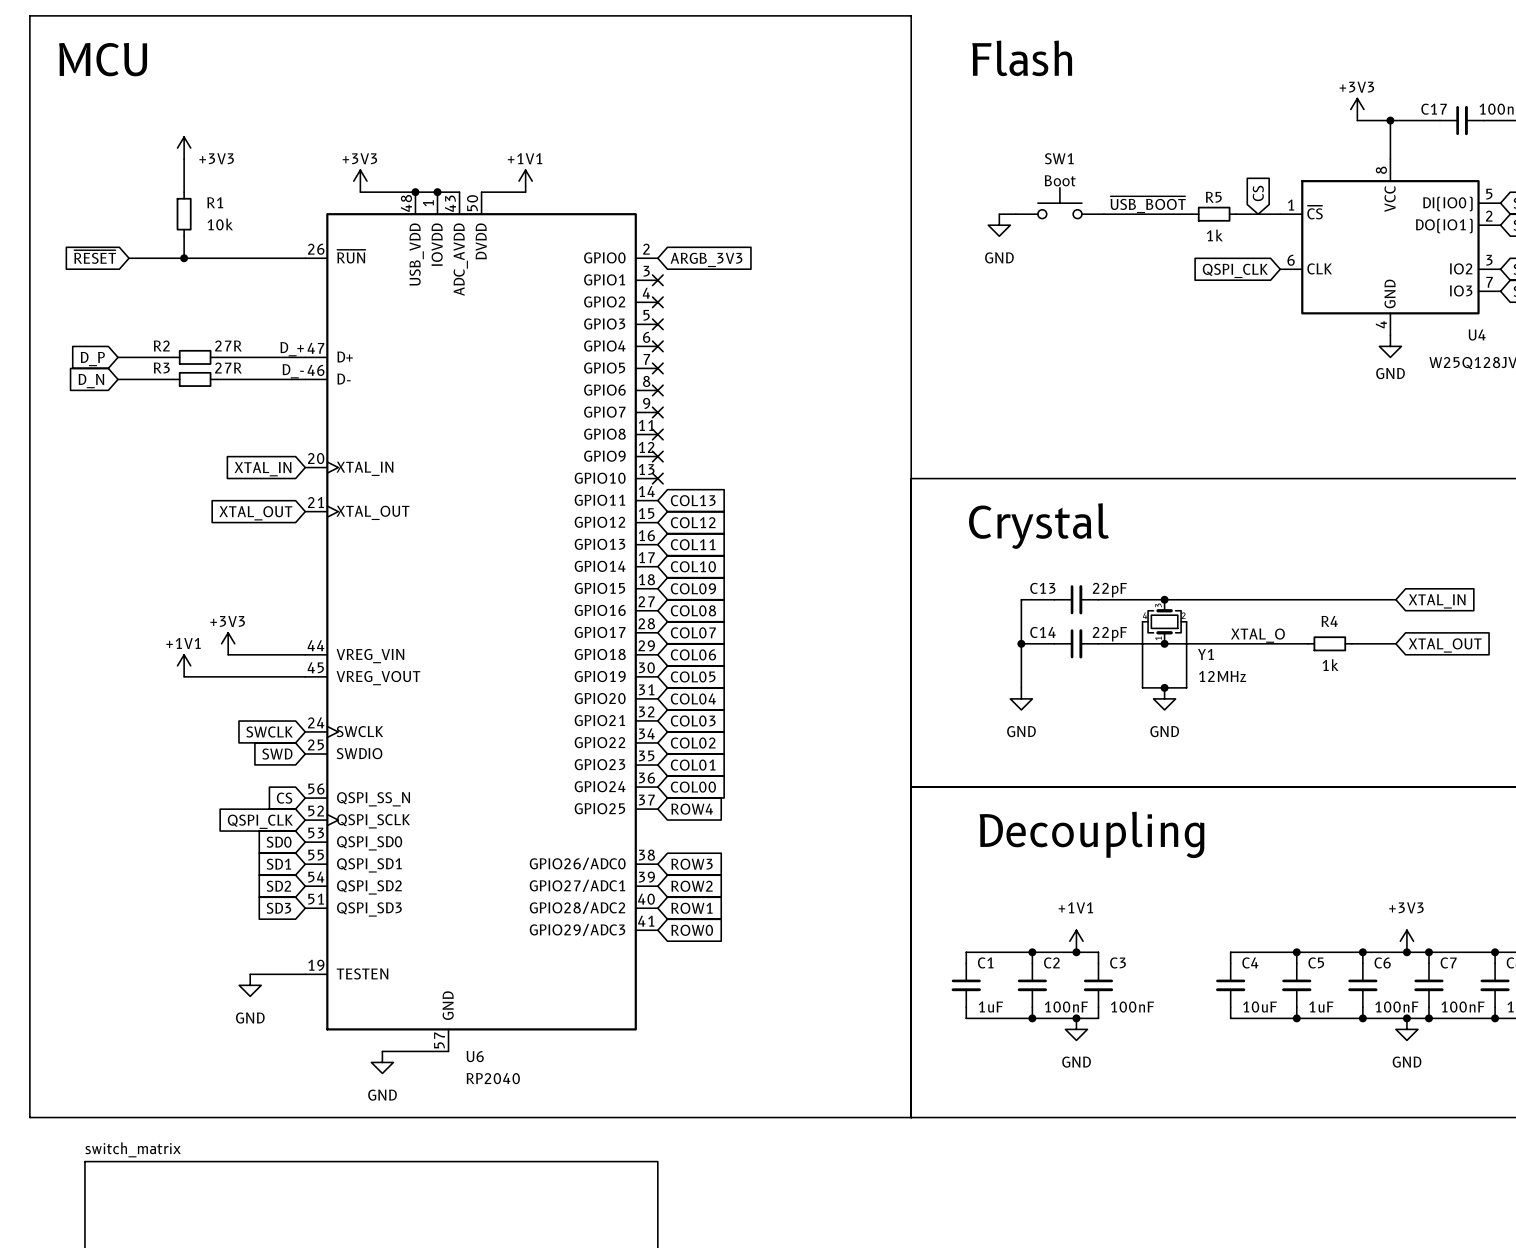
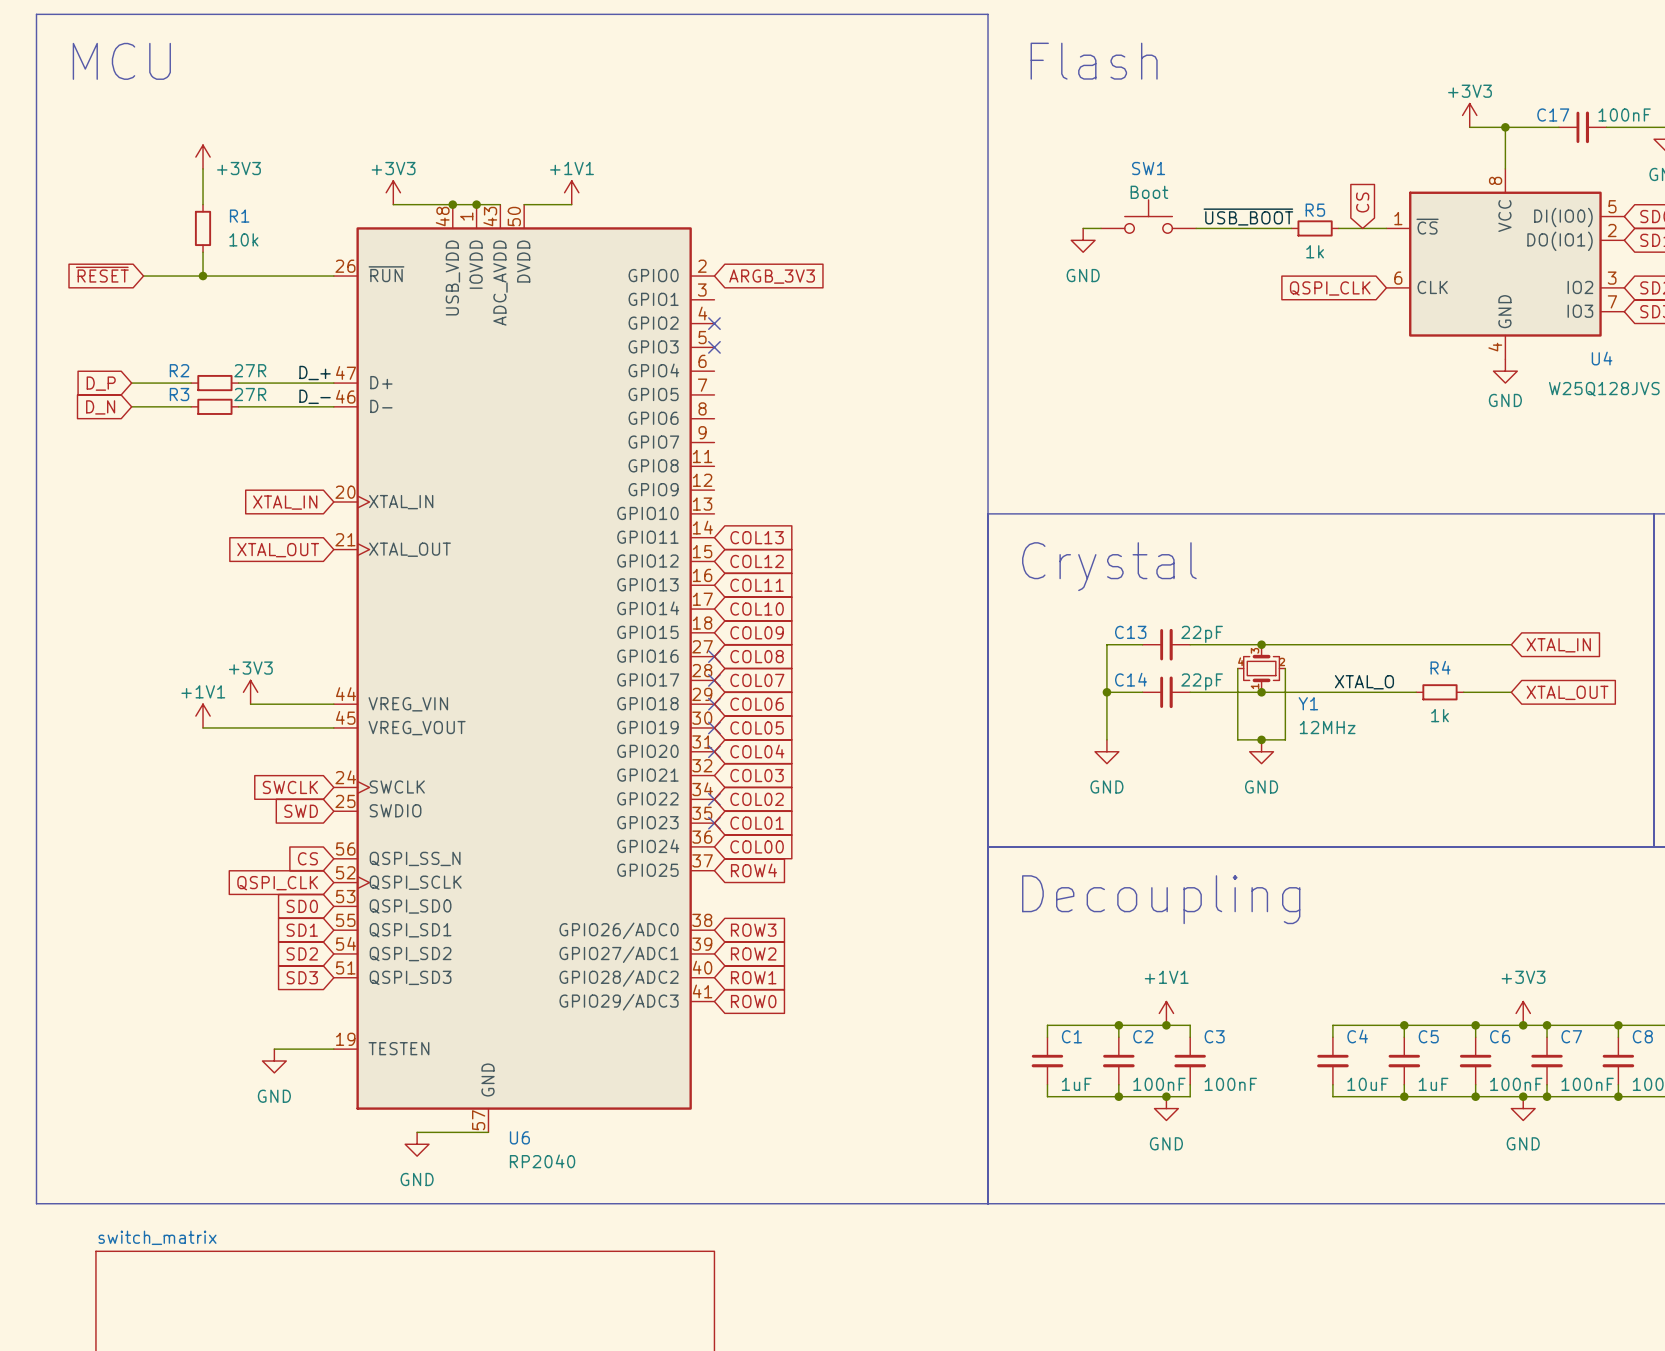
no-connect mark: (657, 280) -> none
no-connect mark: (657, 346) -> none
no-connect mark: (657, 368) -> none
no-connect mark: (657, 390) -> none
no-connect mark: (657, 412) -> none
no-connect mark: (657, 434) -> none
no-connect mark: (657, 456) -> none
no-connect mark: (657, 478) -> none
no-connect mark: none -> (714, 656)
no-connect mark: none -> (714, 680)
no-connect mark: none -> (714, 704)
no-connect mark: none -> (714, 727)
no-connect mark: none -> (714, 751)
no-connect mark: none -> (714, 799)
no-connect mark: none -> (714, 823)

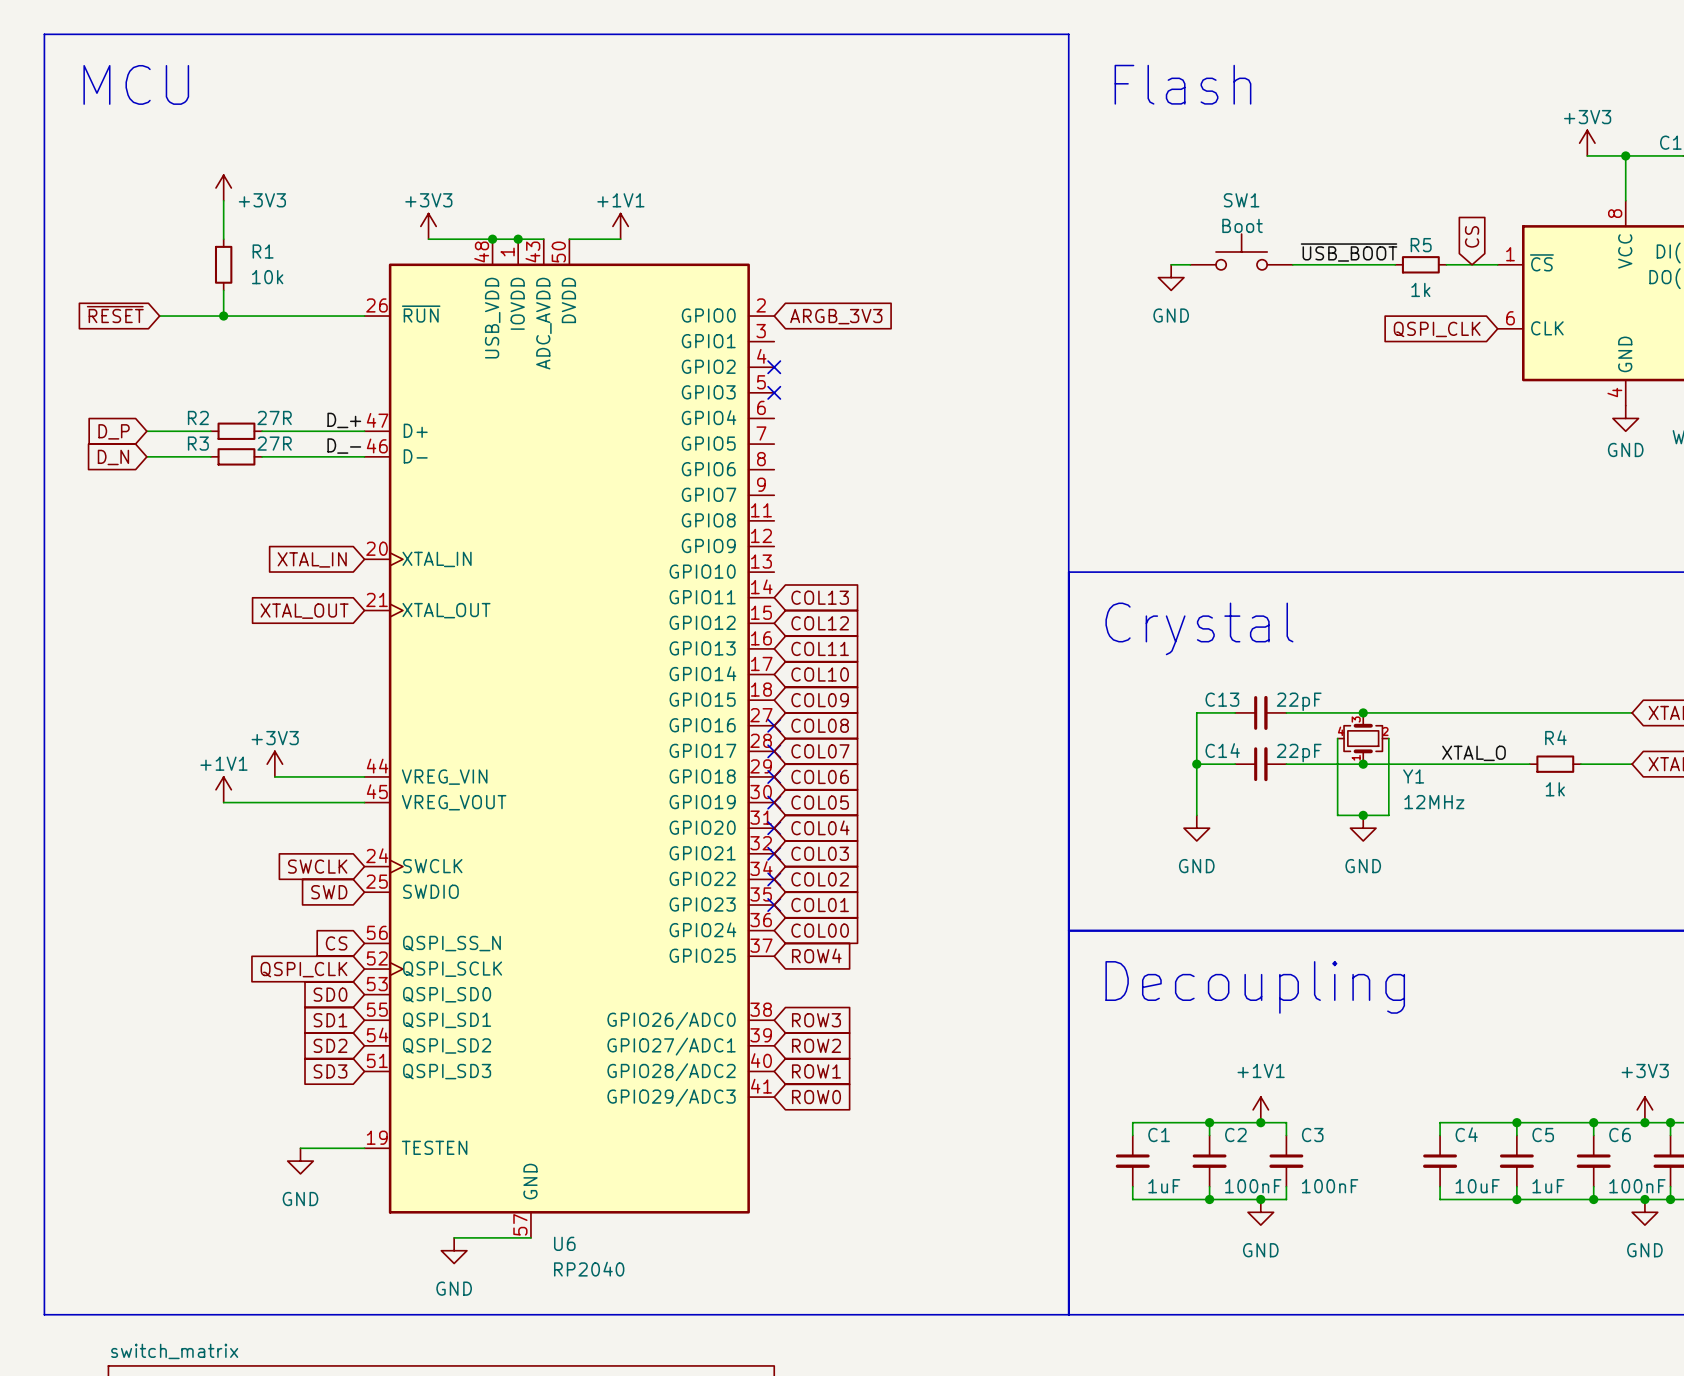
no-connect mark: none -> (774, 853)

